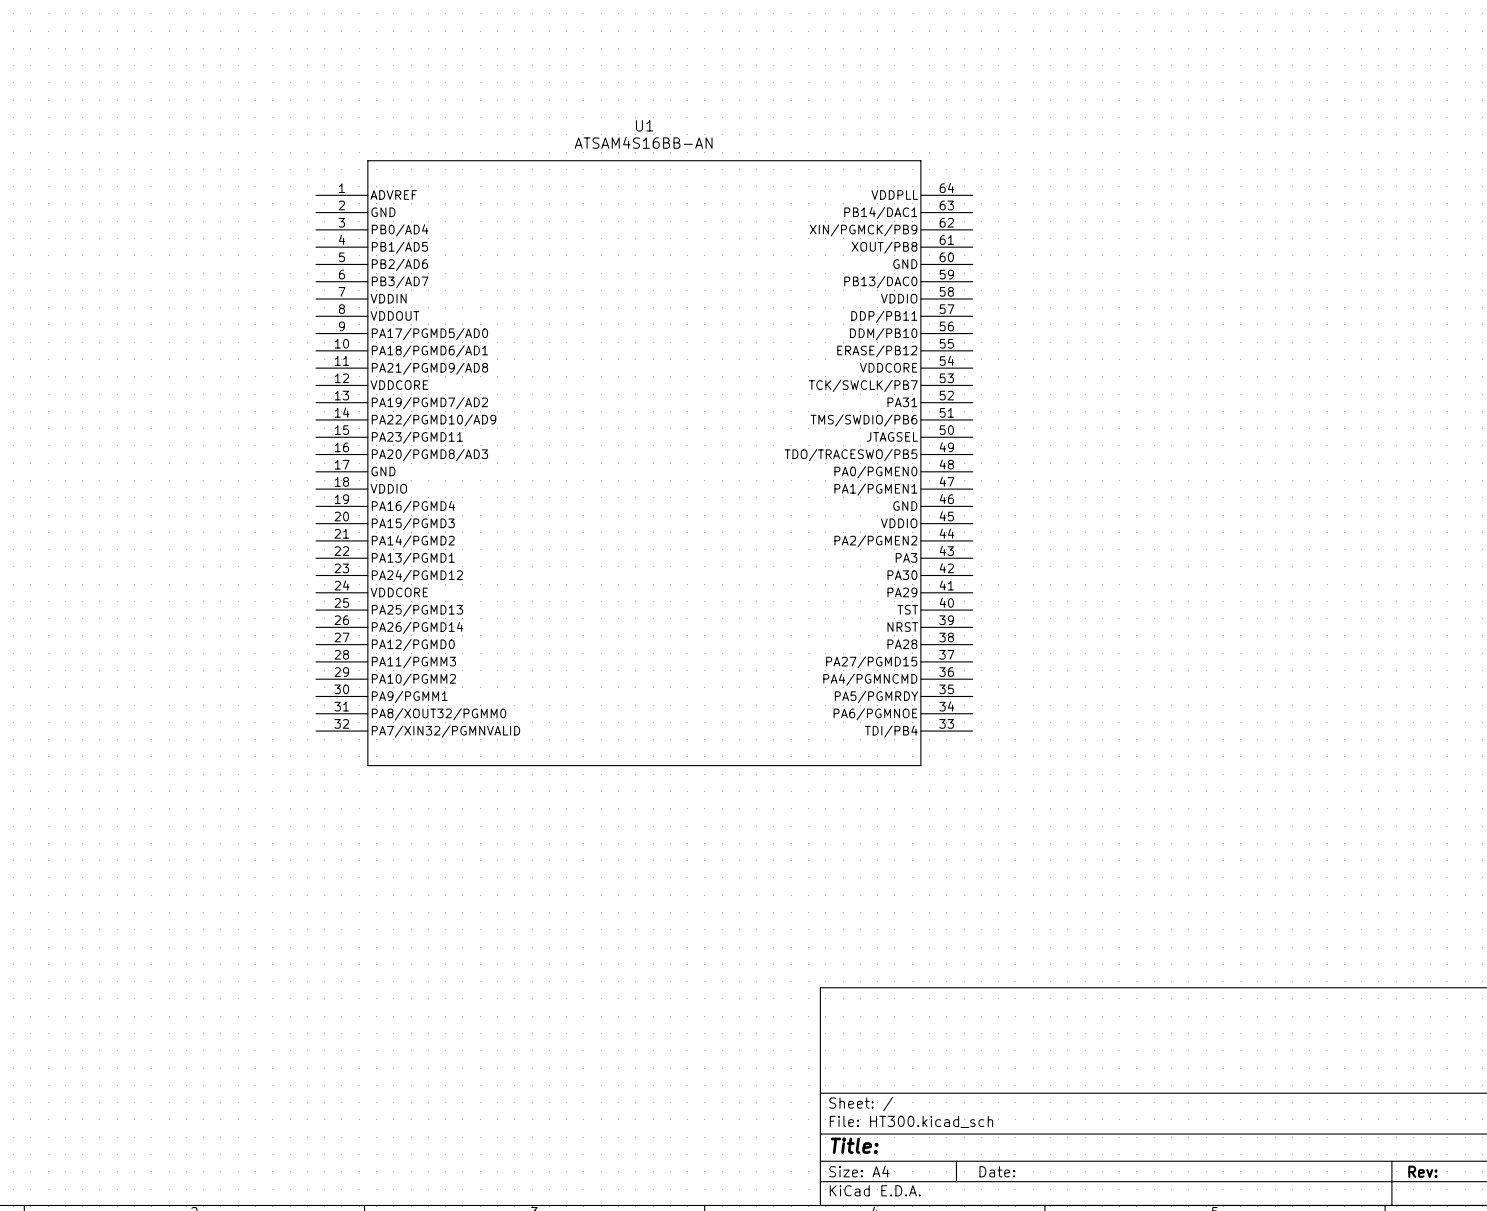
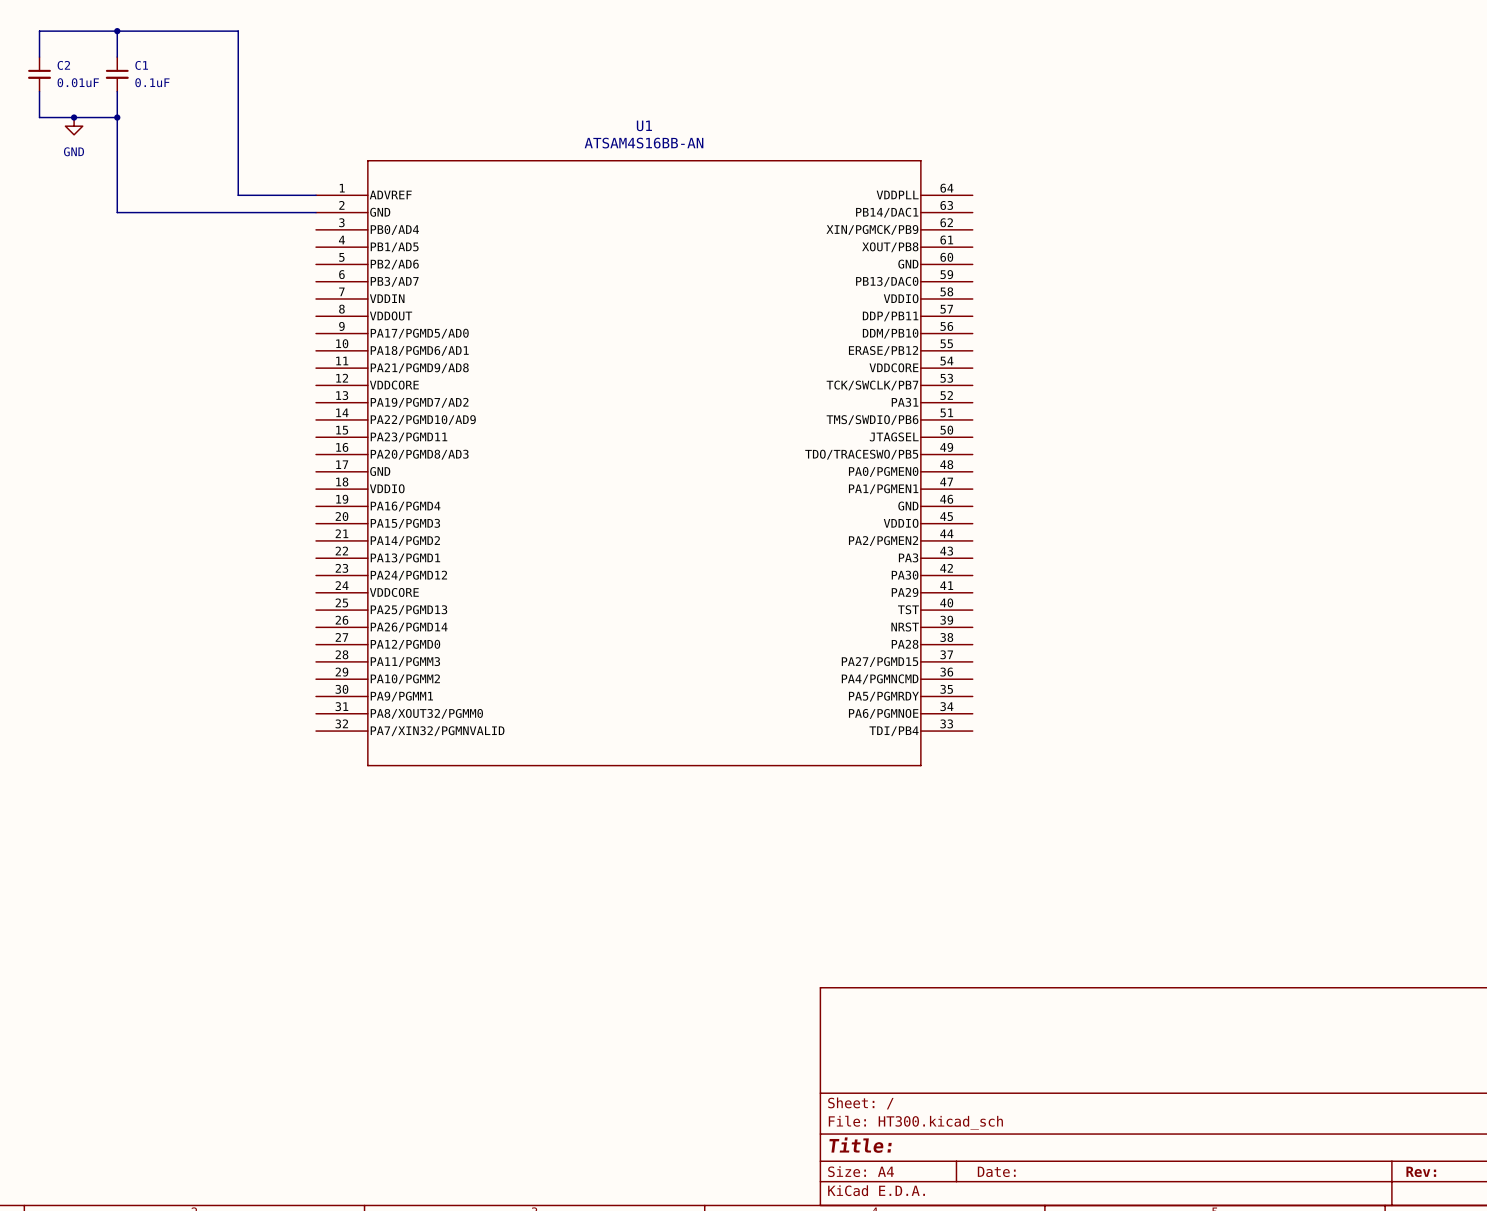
wire: none -> (117, 31) (117, 57)
junction: none -> (117, 31)
wire: none -> (39, 57) (39, 31) (238, 31) (238, 195) (316, 195)
C2: none -> 0.01uF (39, 74)
C1: none -> 0.1uF (117, 74)
wire: none -> (39, 91) (39, 117) (117, 117)
wire: none -> (117, 91) (117, 212) (316, 212)
junction: none -> (74, 117)
junction: none -> (117, 117)
power symbol: none -> GND (74, 126)

